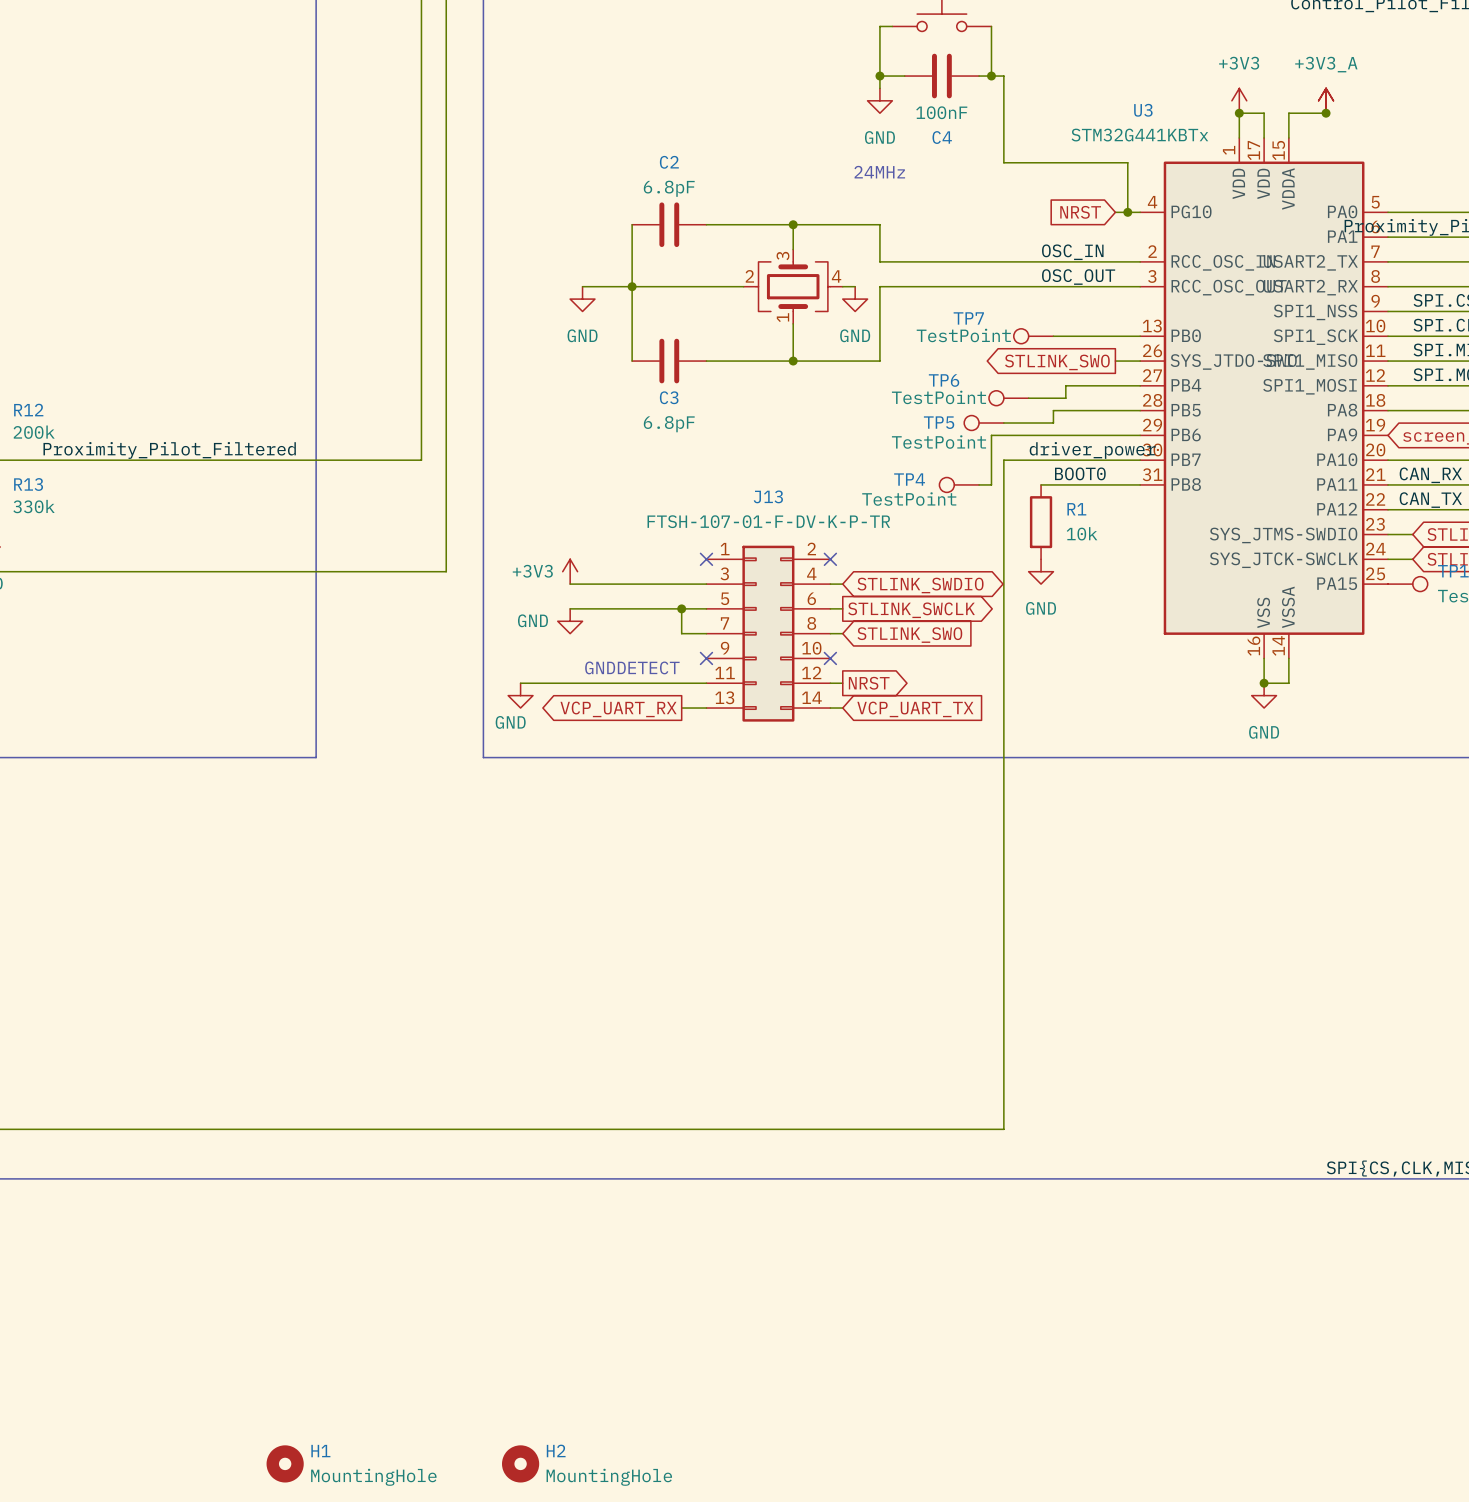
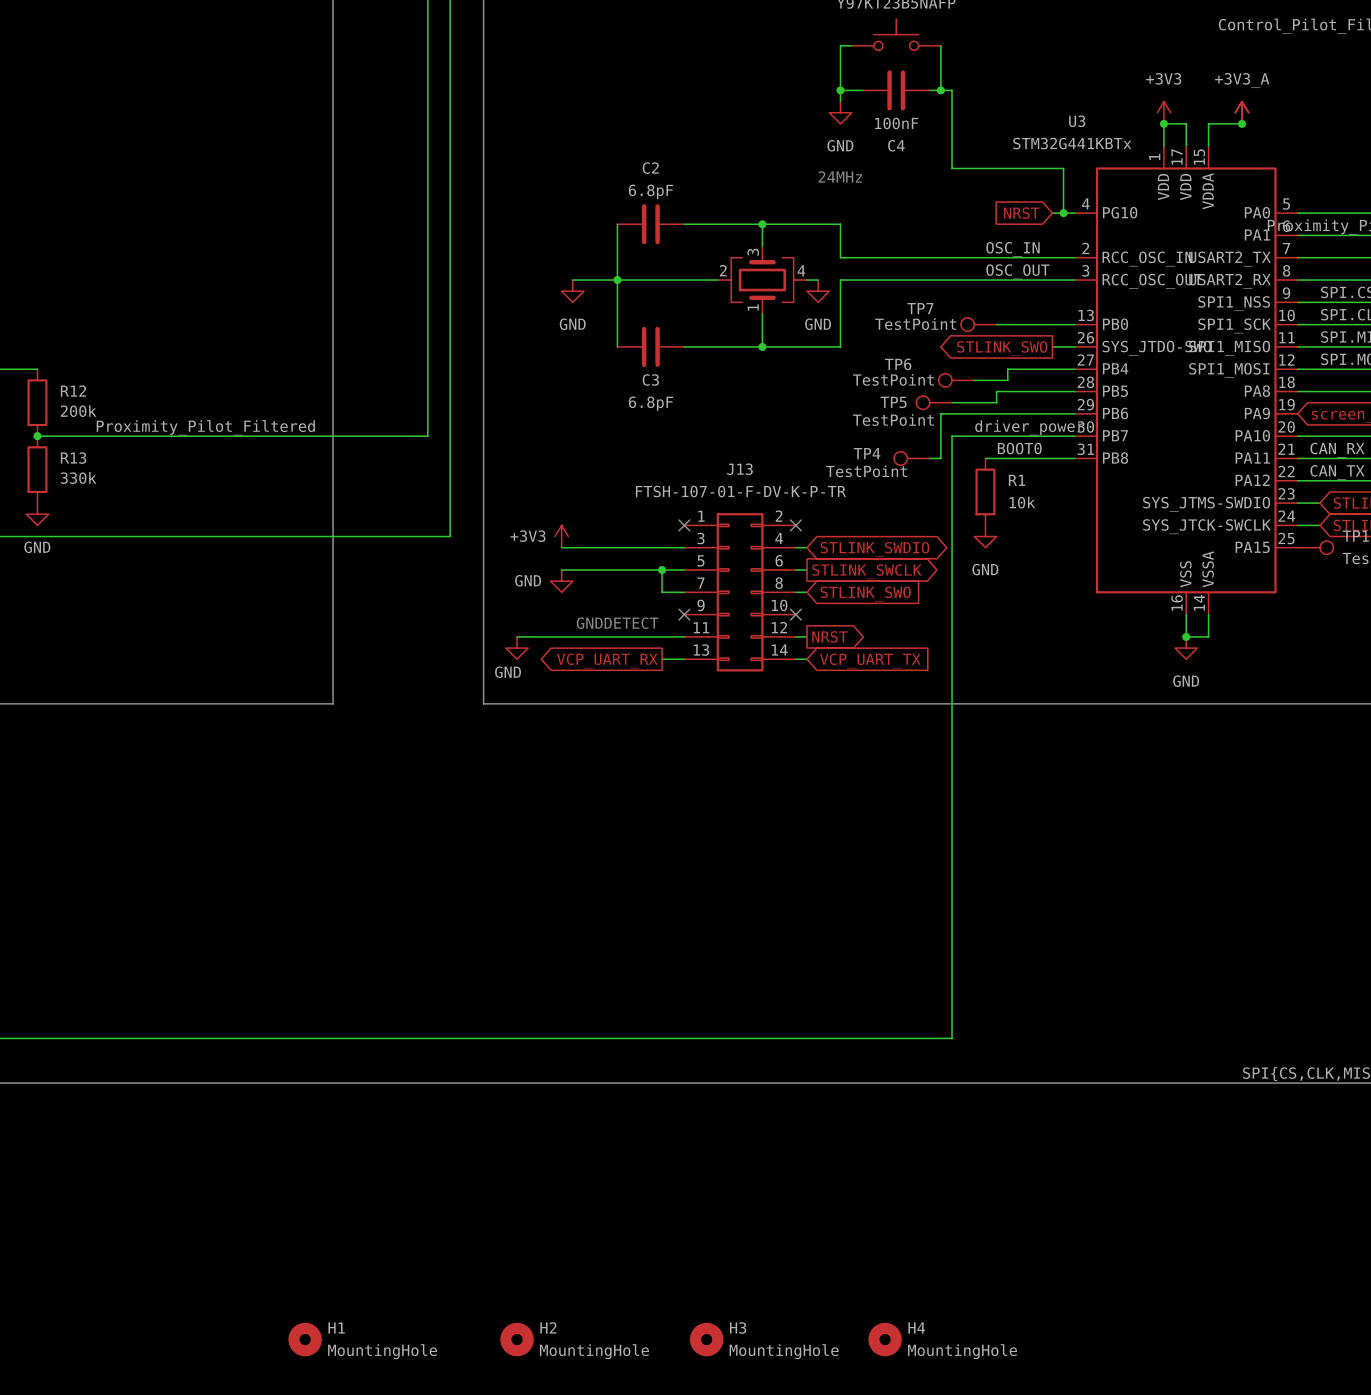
H3: none -> MountingHole (706, 1339)
H4: none -> MountingHole (885, 1339)

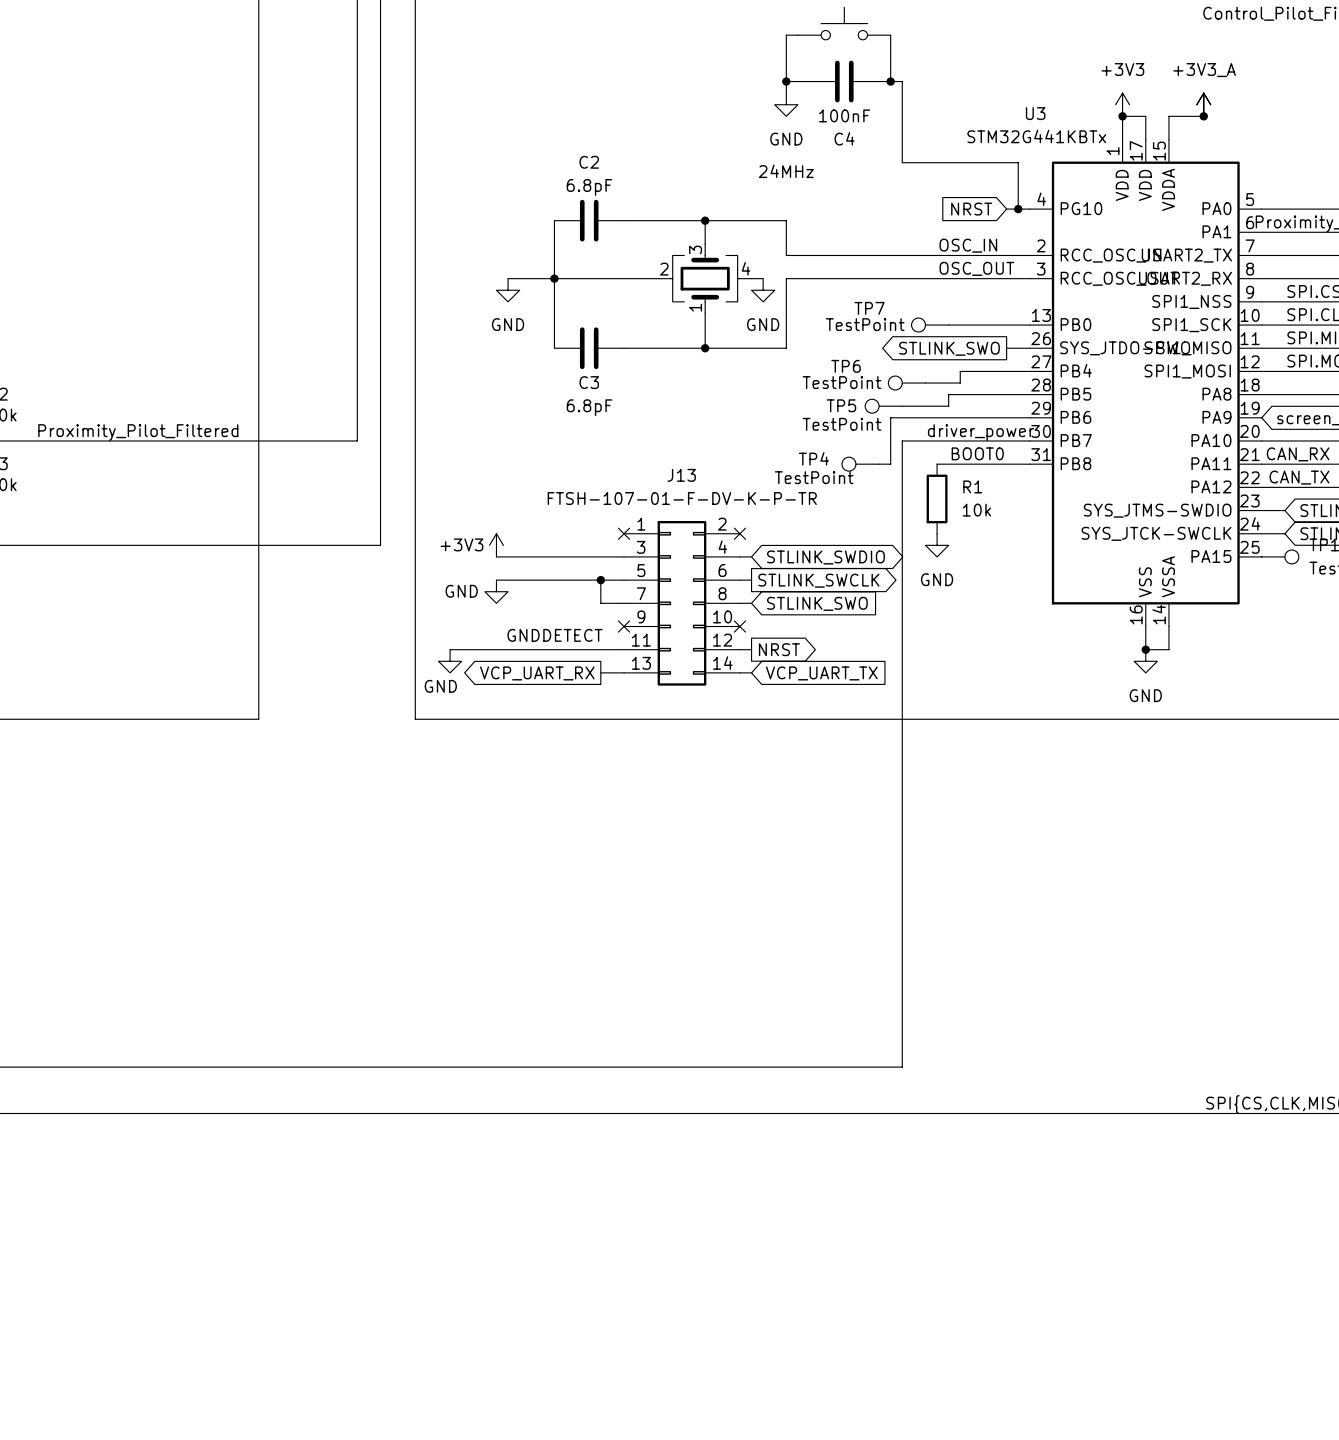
H1: MountingHole (305, 1339) -> none
H2: MountingHole (517, 1339) -> none
H3: MountingHole (706, 1339) -> none
H4: MountingHole (885, 1339) -> none

